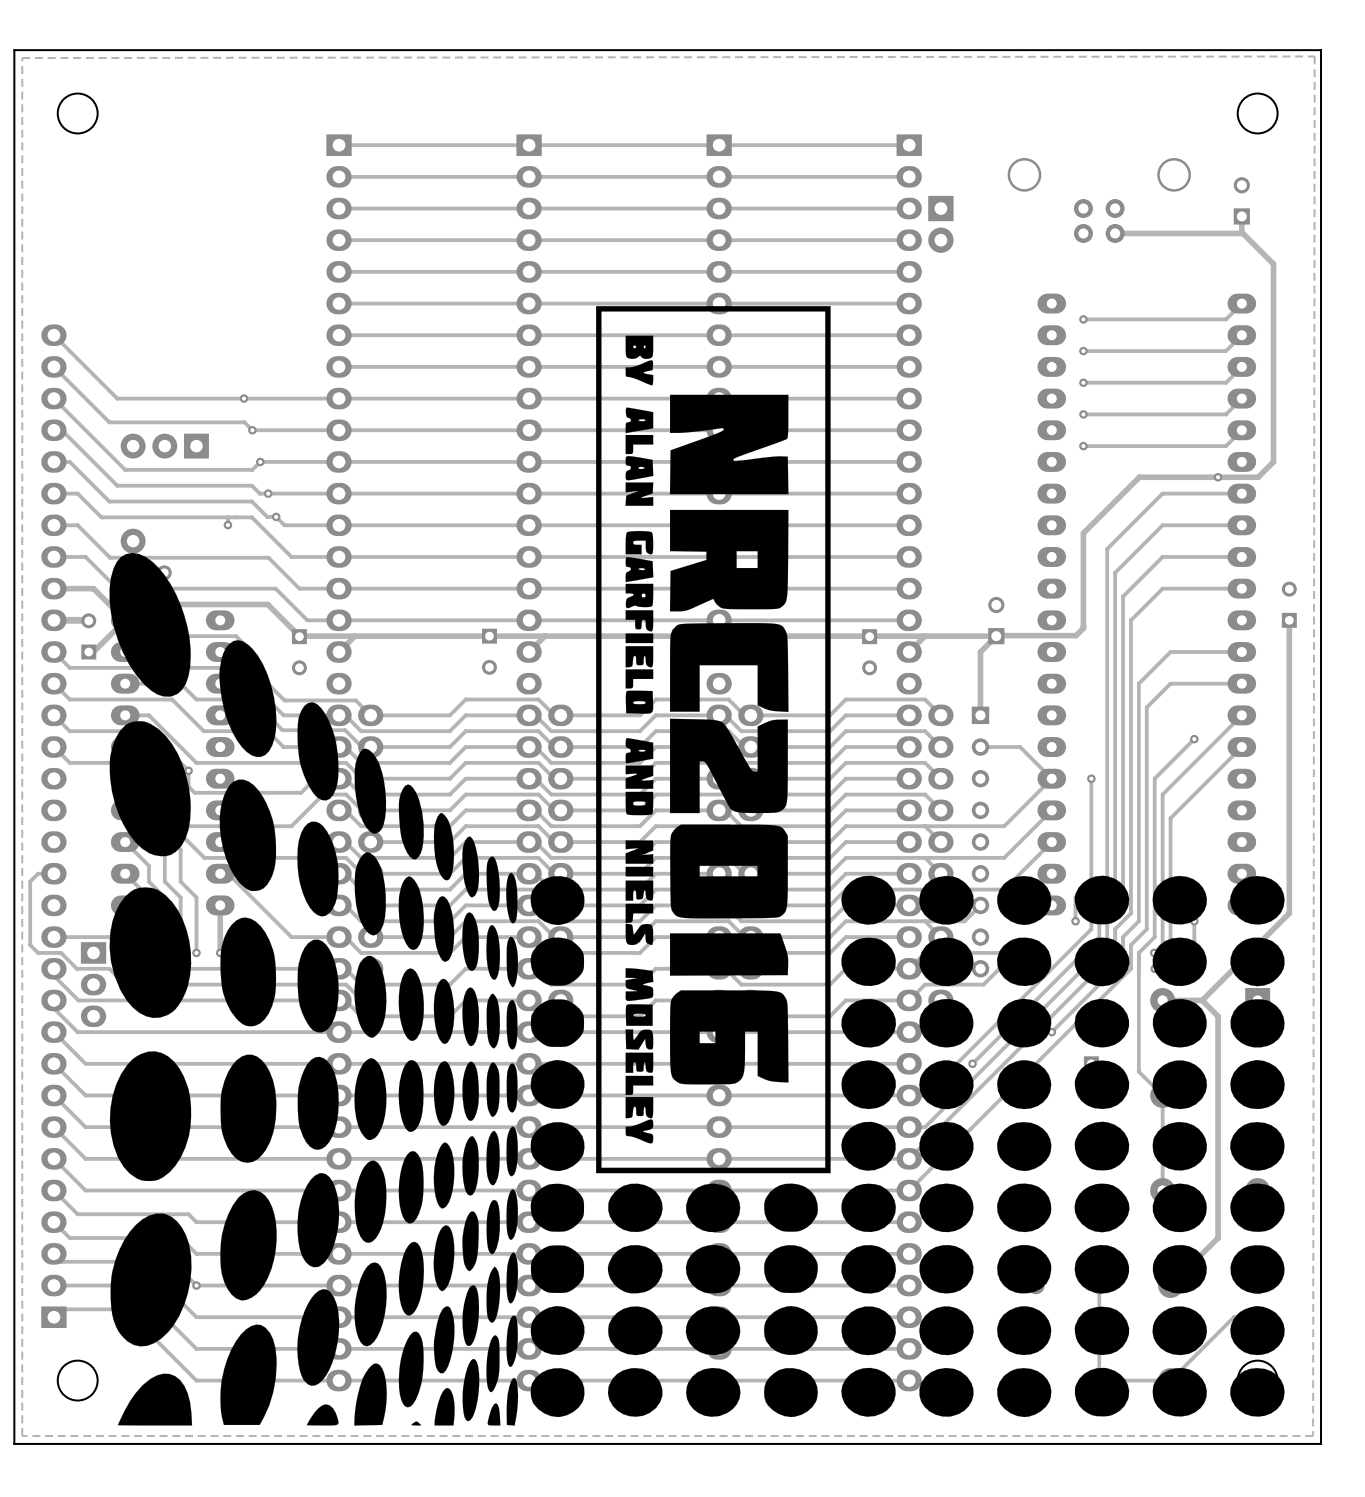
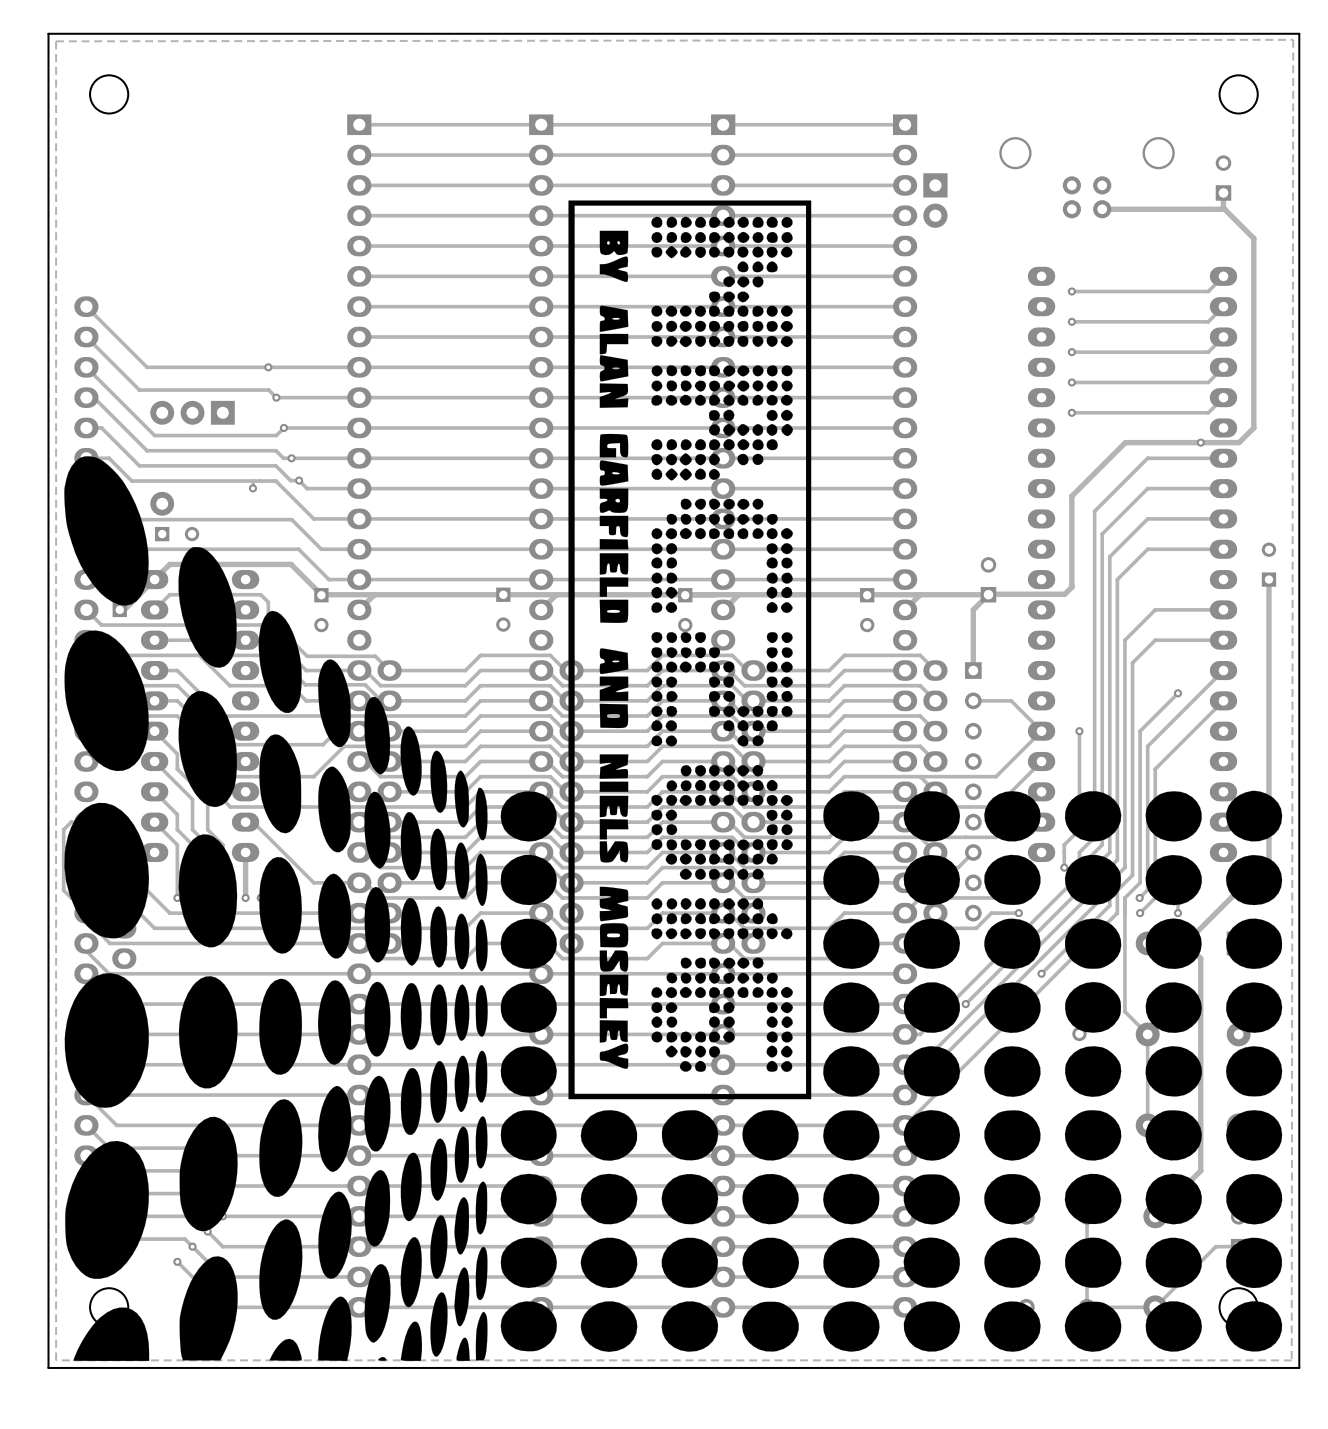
drawing: none -> [64, 200, 1283, 1362]
drawing: [109, 306, 1285, 1426] -> none

